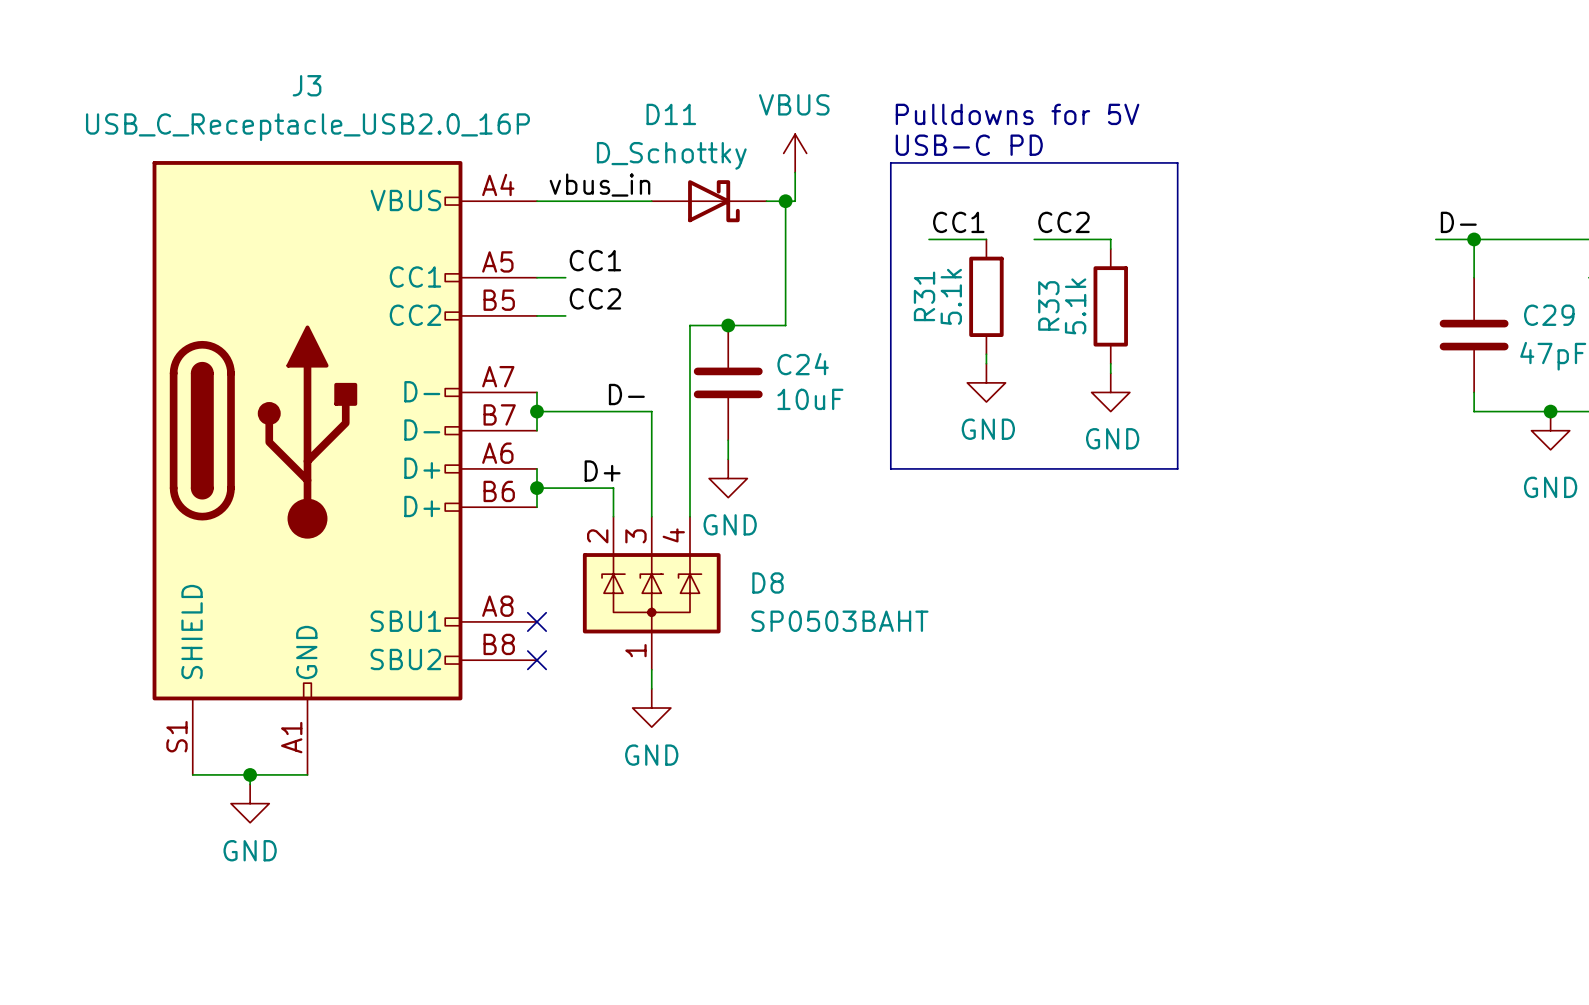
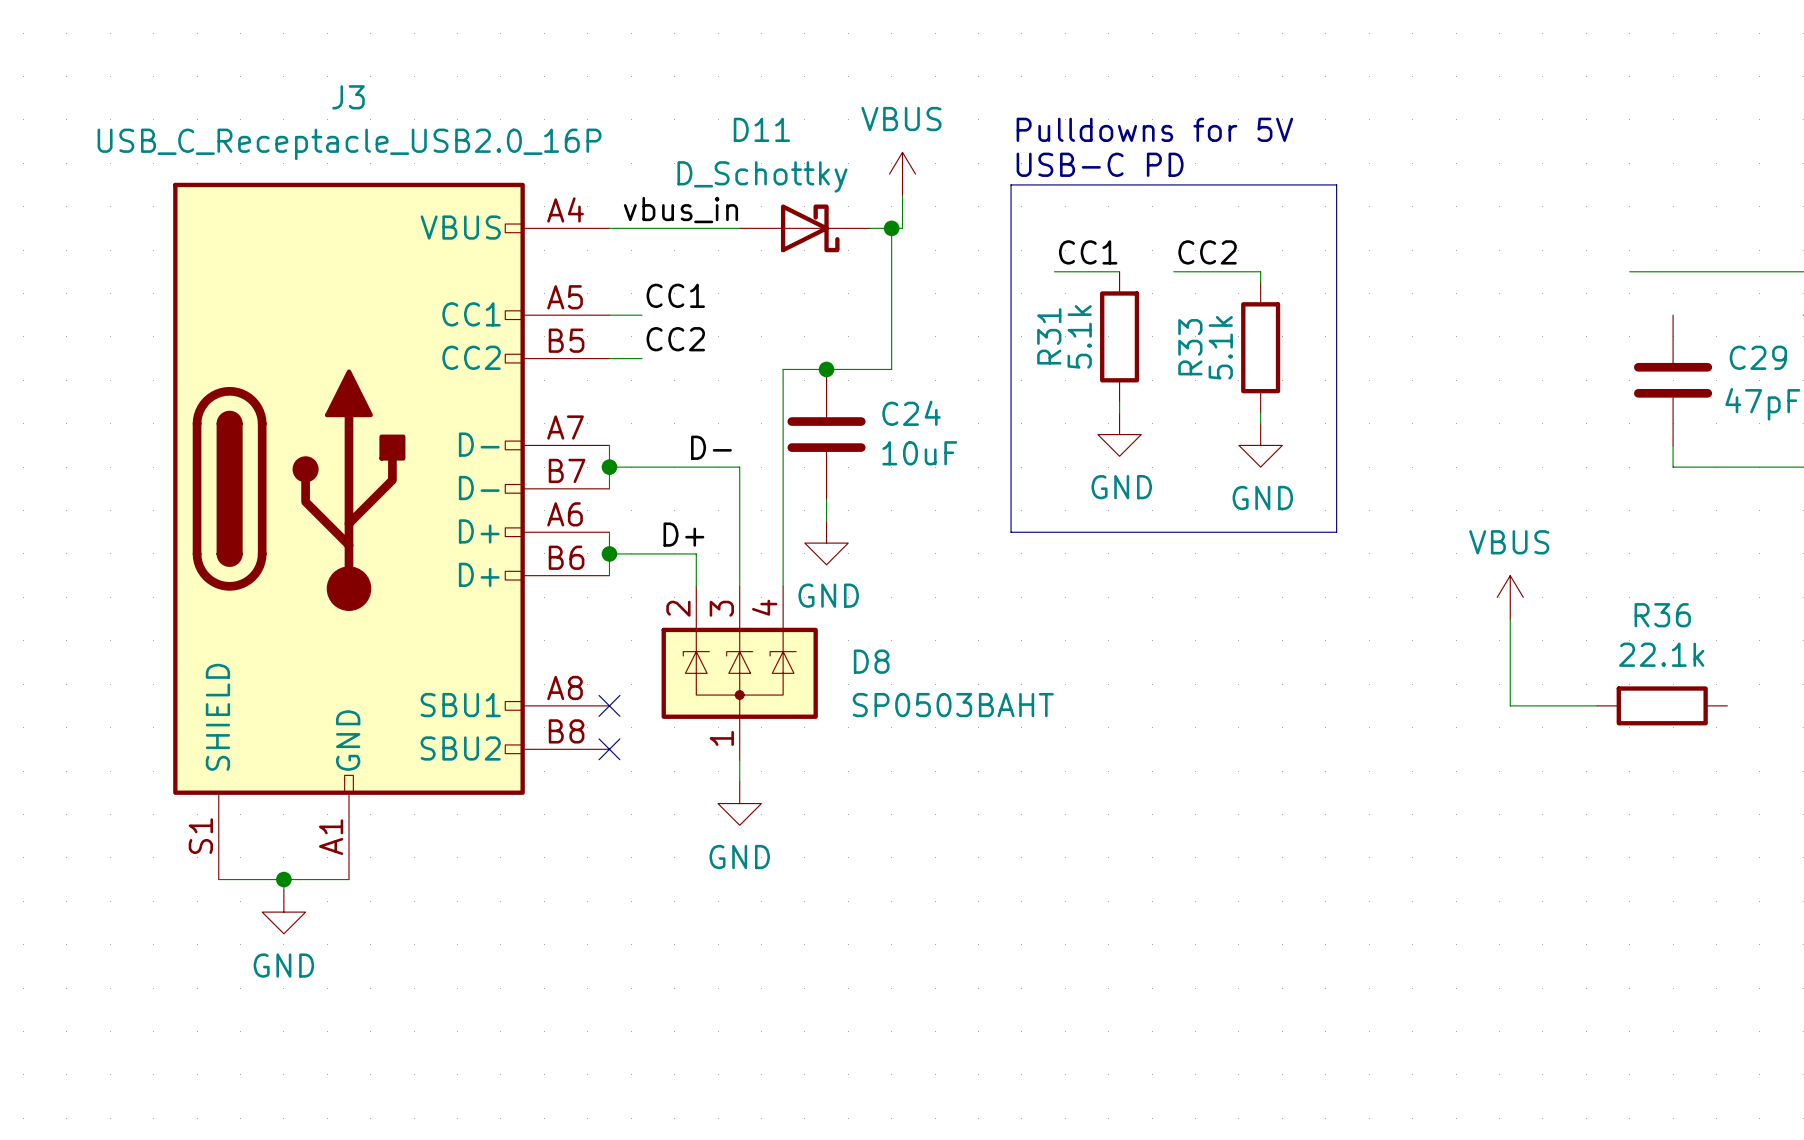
label: D- (1458, 222) -> none
wire: (1474, 239) (1474, 277) -> none
junction: (1474, 239) -> none
junction: (1550, 411) -> none
power symbol: GND (1550, 430) -> none
power symbol: none -> VBUS (1510, 597)
wire: none -> (1510, 619) (1510, 705) (1597, 705)
R36: none -> 22.1k (1662, 705)

